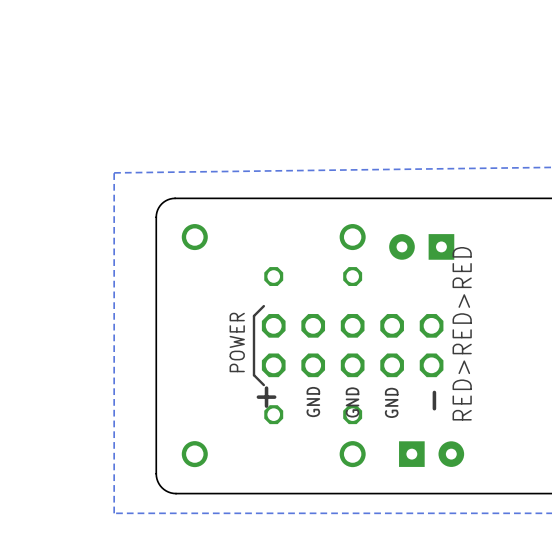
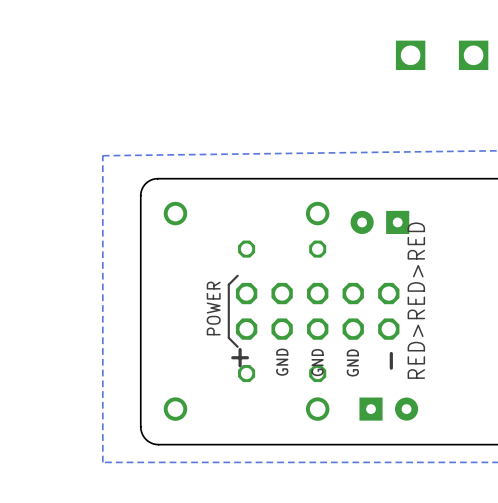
part: none -> (442, 55)

